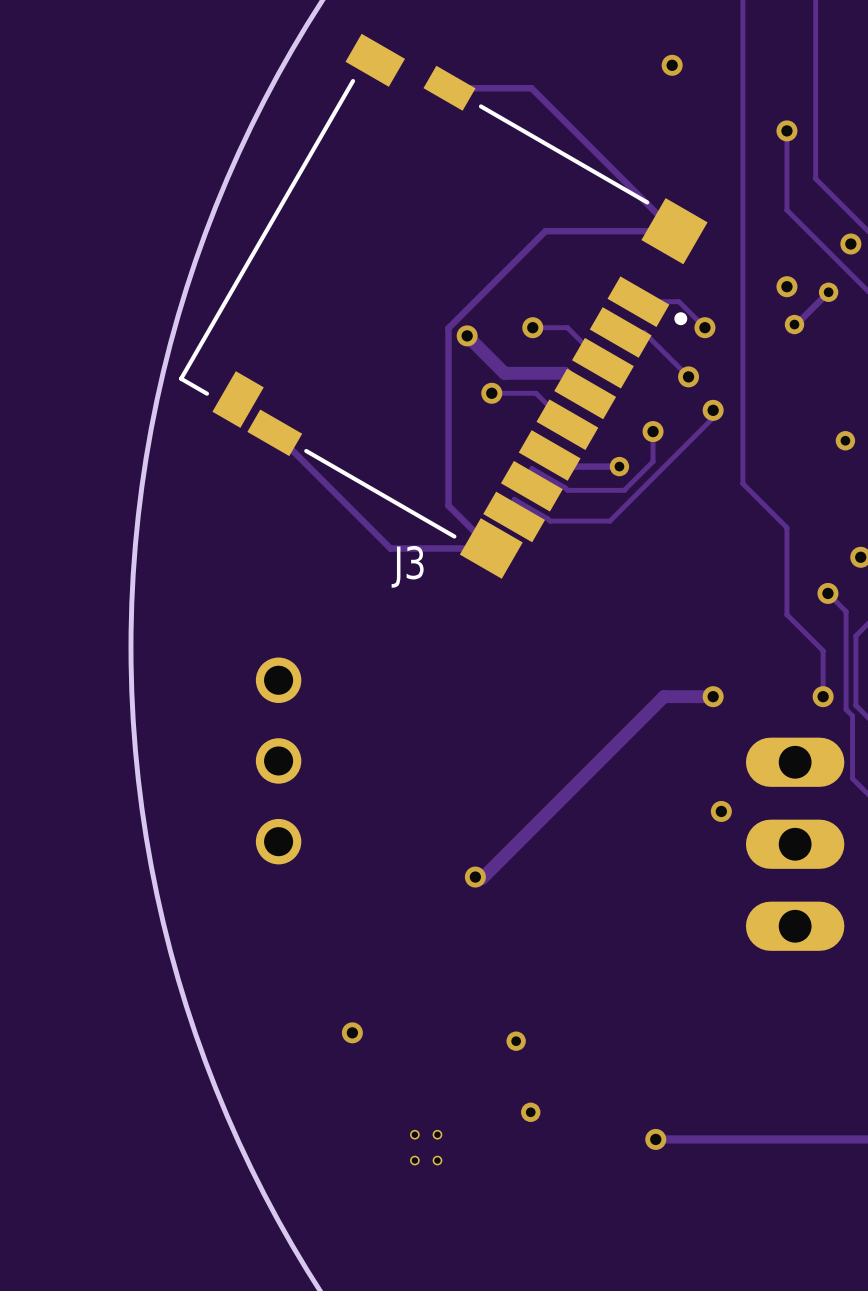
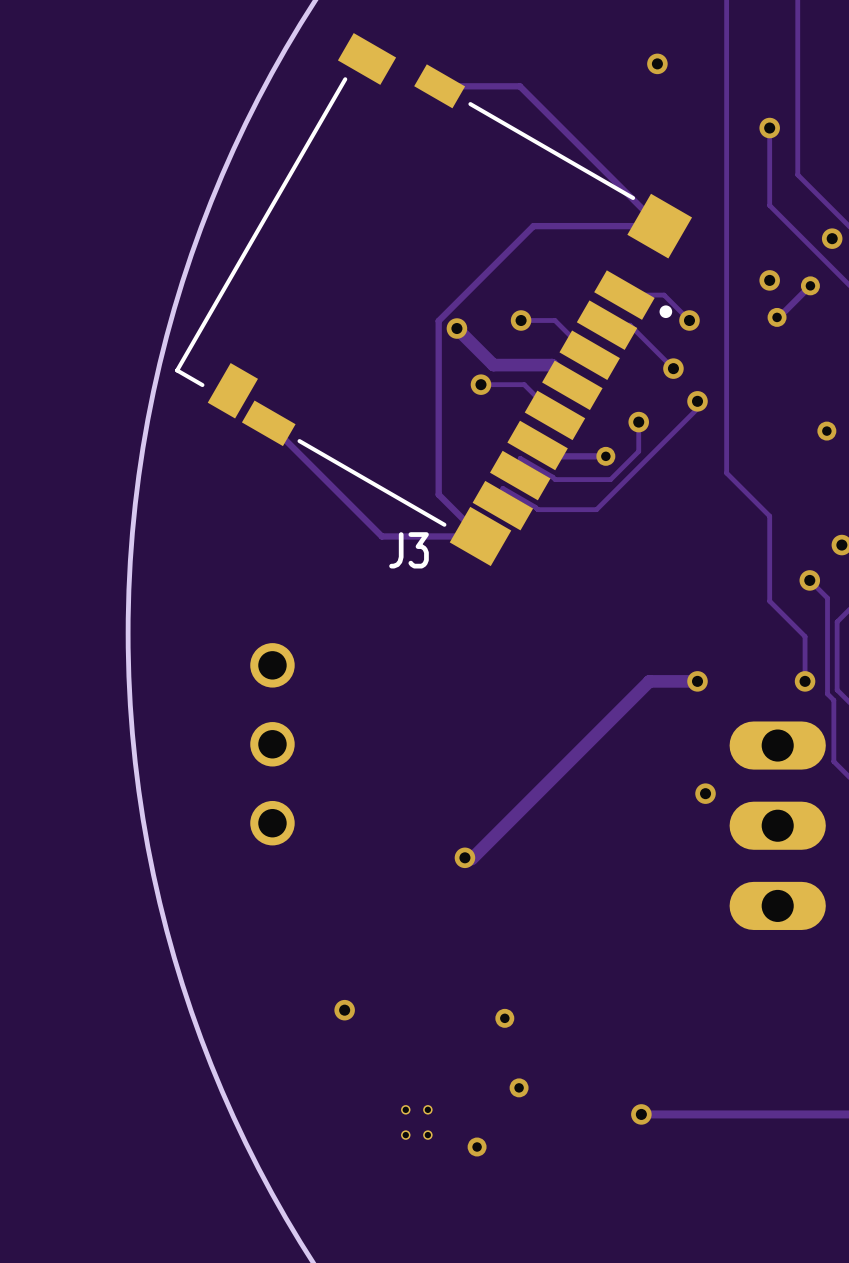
via: none -> (477, 1147)

